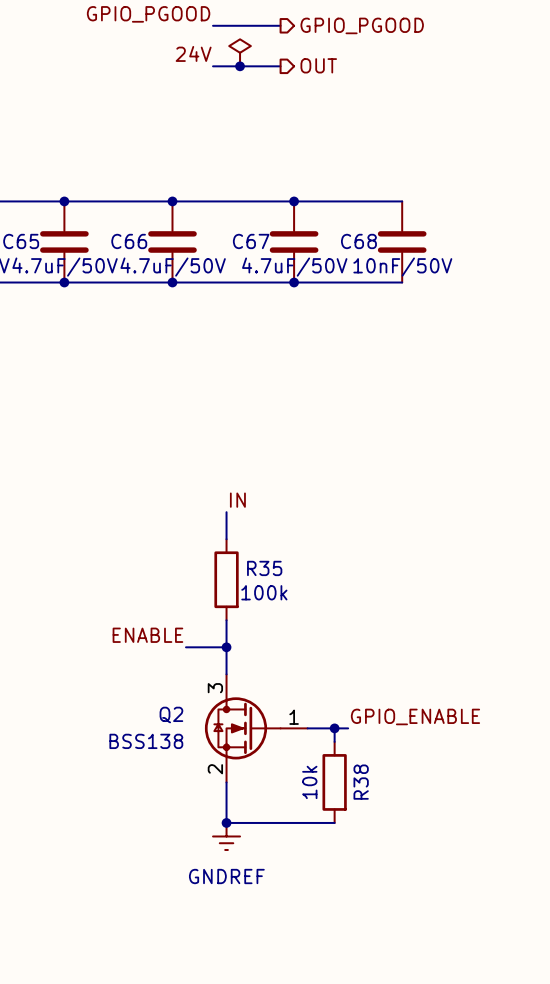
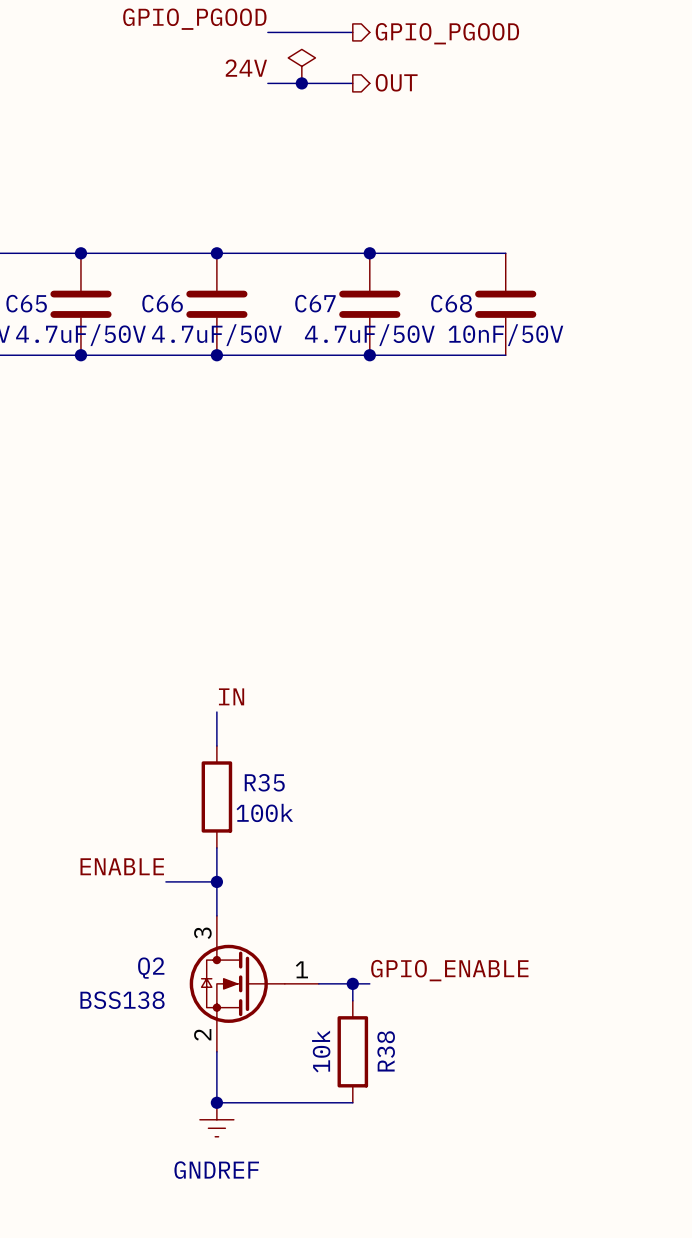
label position: IN (237, 500) -> IN (231, 696)
wire: (226, 512) (226, 539) -> (216, 712) (216, 746)
R35 position: (226, 579) -> (216, 796)
wire: (226, 620) (226, 674) -> (216, 847) (216, 915)
label position: ENABLE (147, 635) -> ENABLE (122, 866)
wire: (186, 647) (226, 647) -> (165, 881) (216, 881)
junction: (226, 647) -> none
junction: none -> (216, 881)
label position: GPIO_ENABLE (415, 716) -> GPIO_ENABLE (449, 970)
Q2 position: (256, 728) -> (254, 983)
wire: (307, 728) (348, 728) -> (318, 983) (369, 983)
wire: (334, 728) (334, 741) -> (352, 983) (352, 1000)
junction: (334, 728) -> none
wire: (226, 782) (226, 822) (334, 822) -> (216, 1051) (216, 1102) (352, 1102)
junction: none -> (352, 983)
R38 position: (334, 782) -> (352, 1051)
junction: (226, 822) -> none
power symbol position: GNDREF (226, 836) -> GNDREF (216, 1119)
junction: none -> (216, 1102)

